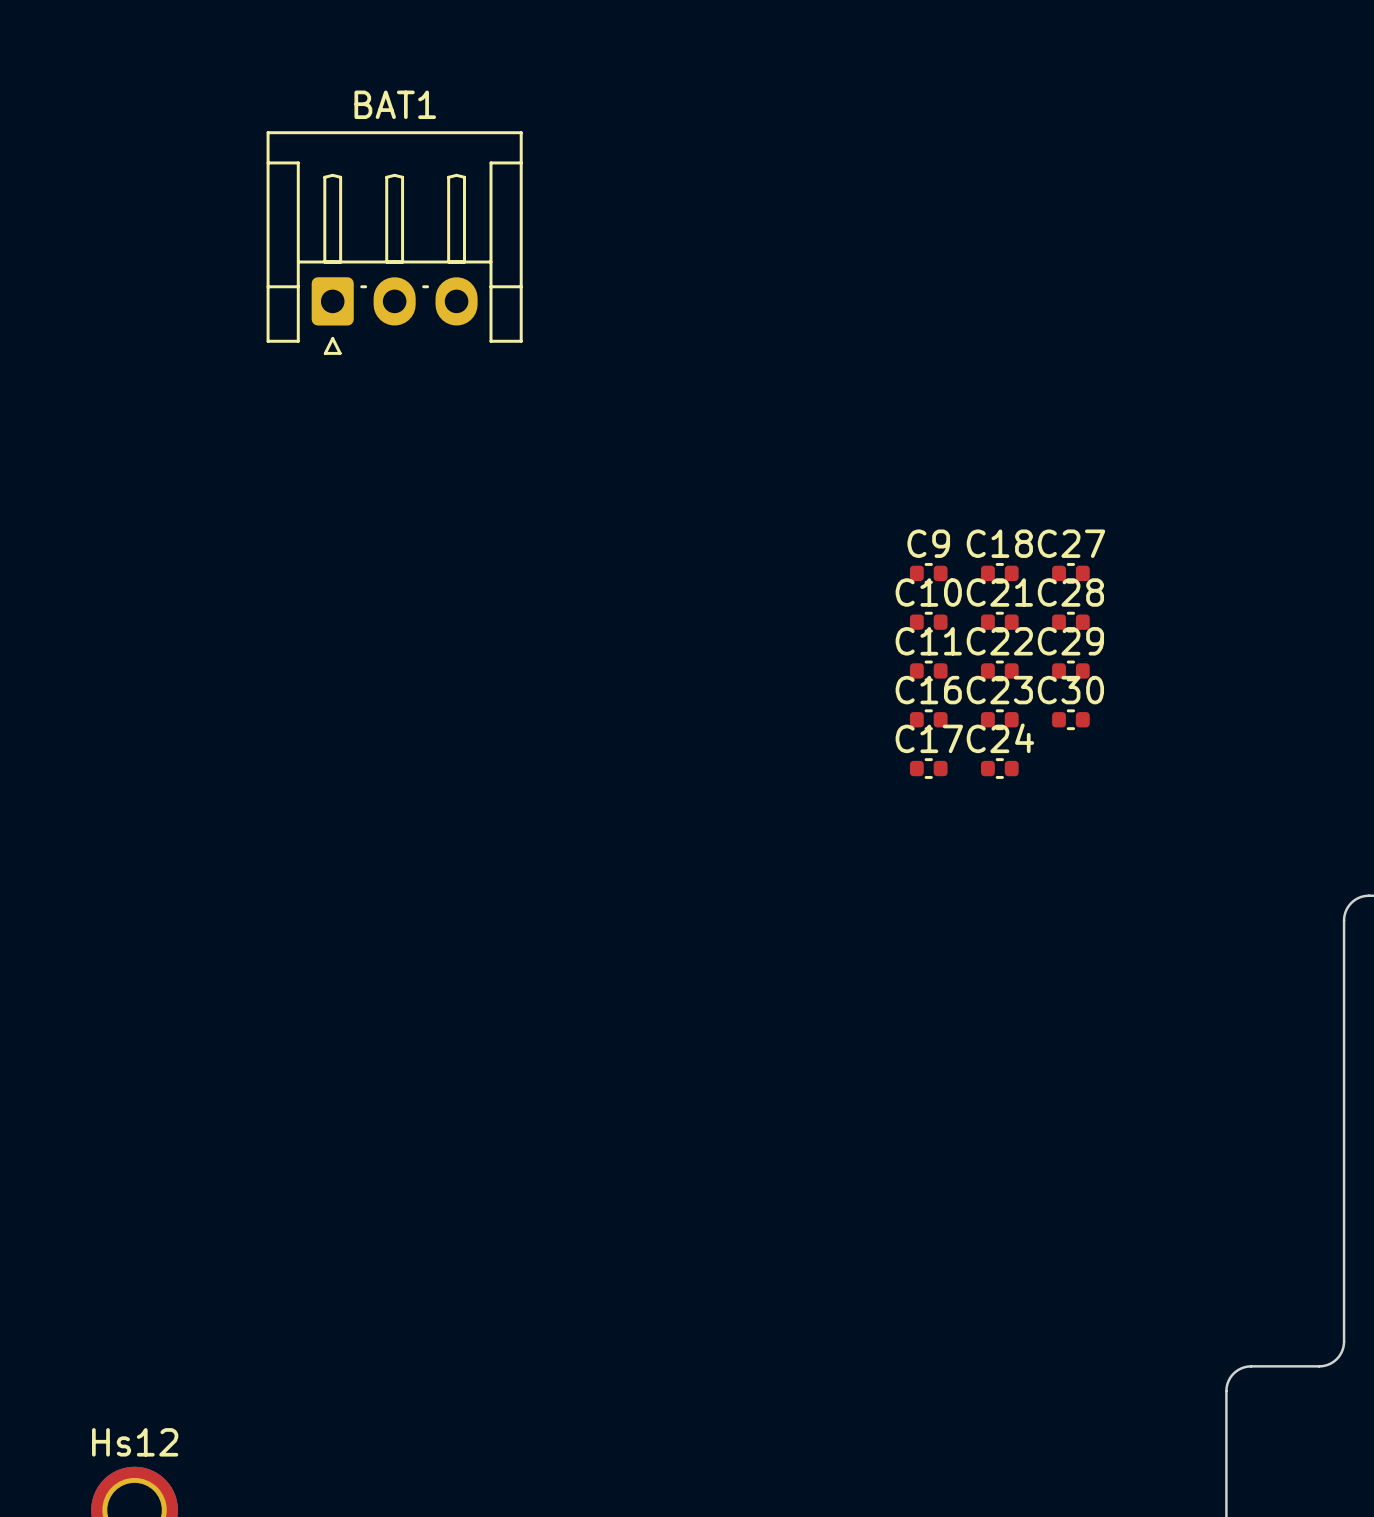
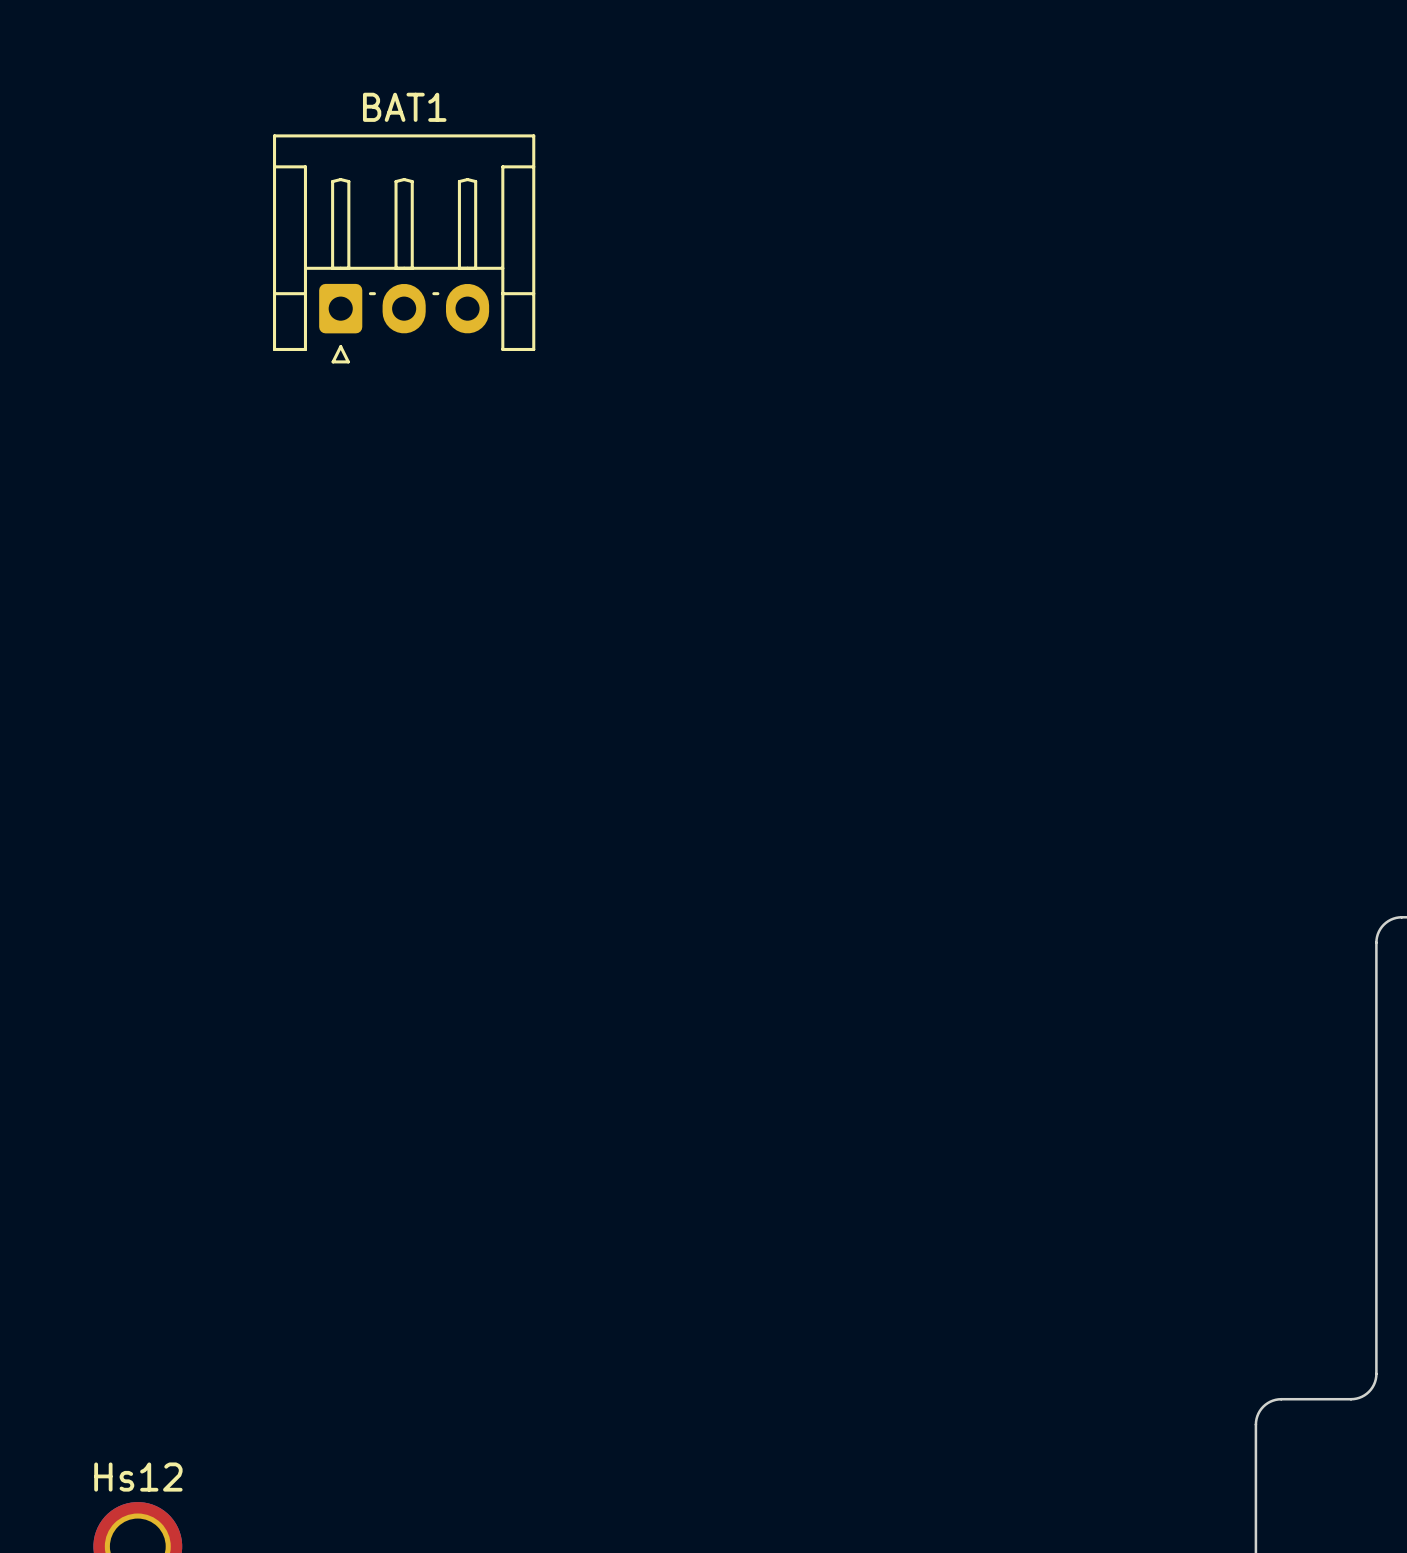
C9: (928, 573) -> none
C18: (999, 573) -> none
C27: (1070, 573) -> none
C10: (928, 622) -> none
C21: (999, 622) -> none
C28: (1070, 622) -> none
C11: (928, 670) -> none
C22: (999, 670) -> none
C29: (1070, 670) -> none
C16: (928, 719) -> none
C23: (999, 719) -> none
C30: (1070, 719) -> none
C17: (928, 768) -> none
C24: (999, 768) -> none

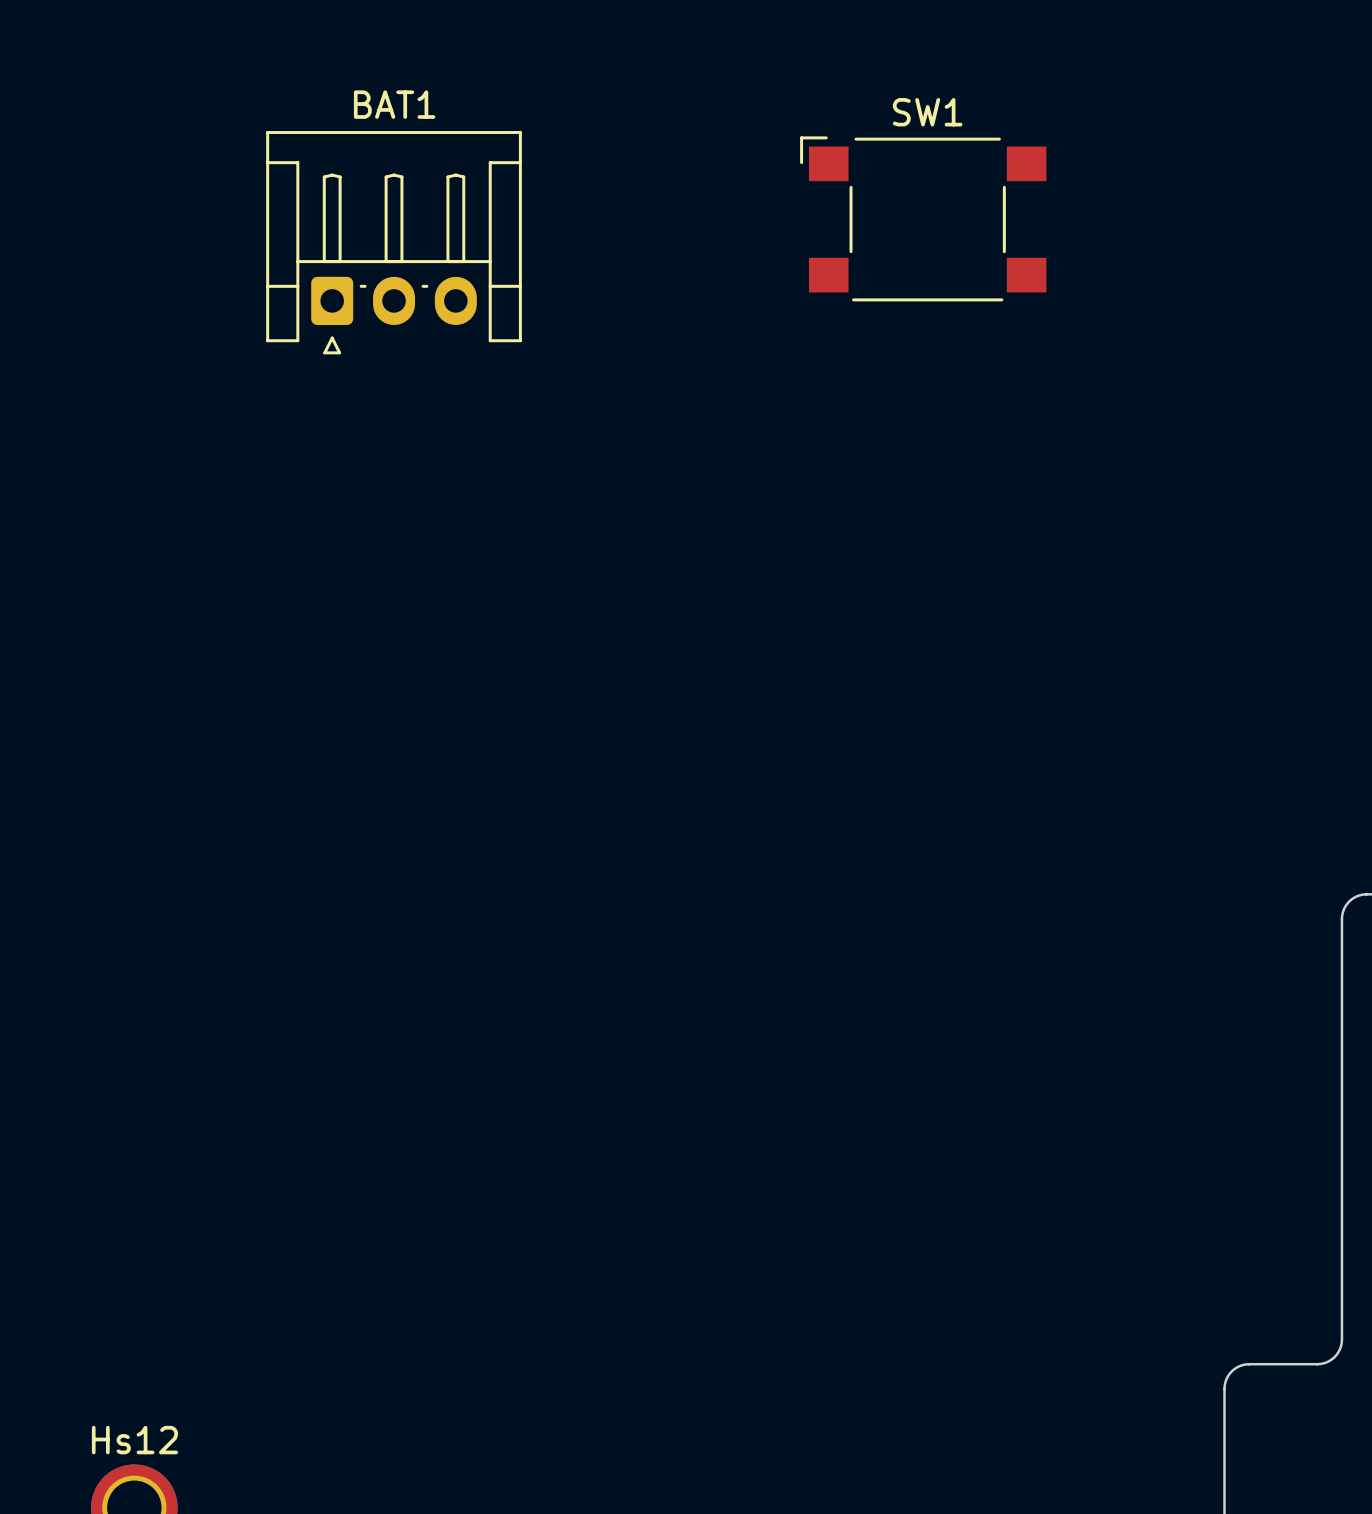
SW1: none -> (923, 218)

